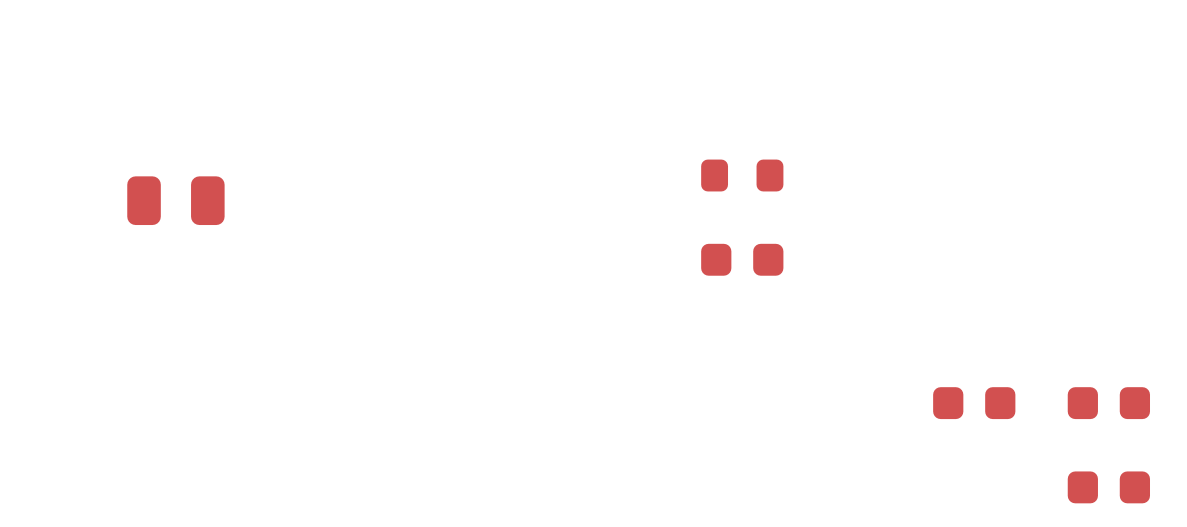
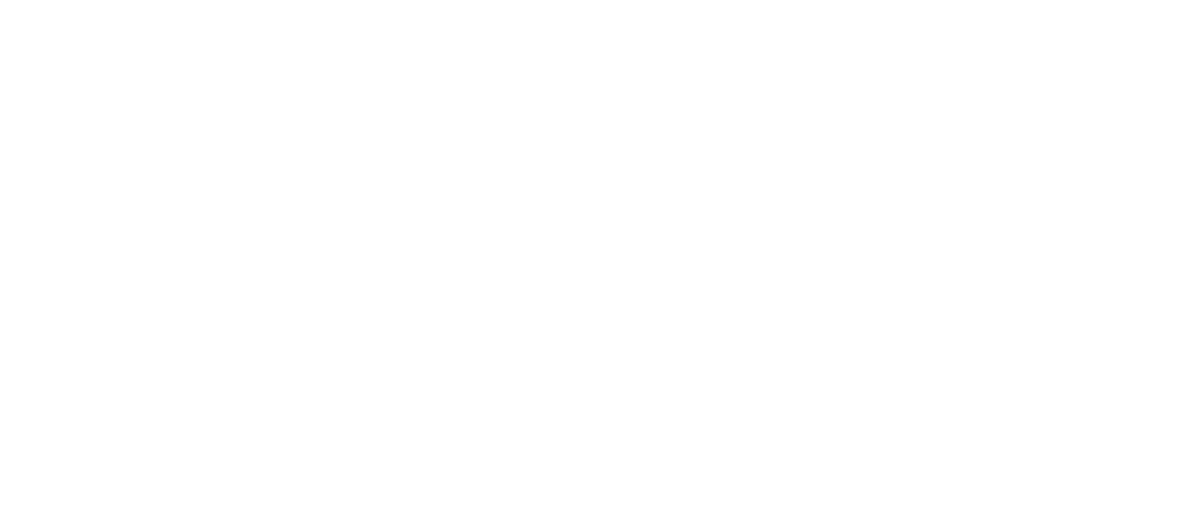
part: (742, 175) -> none
part: (175, 200) -> none
part: (742, 259) -> none
part: (974, 403) -> none
part: (1108, 403) -> none
part: (1108, 487) -> none

